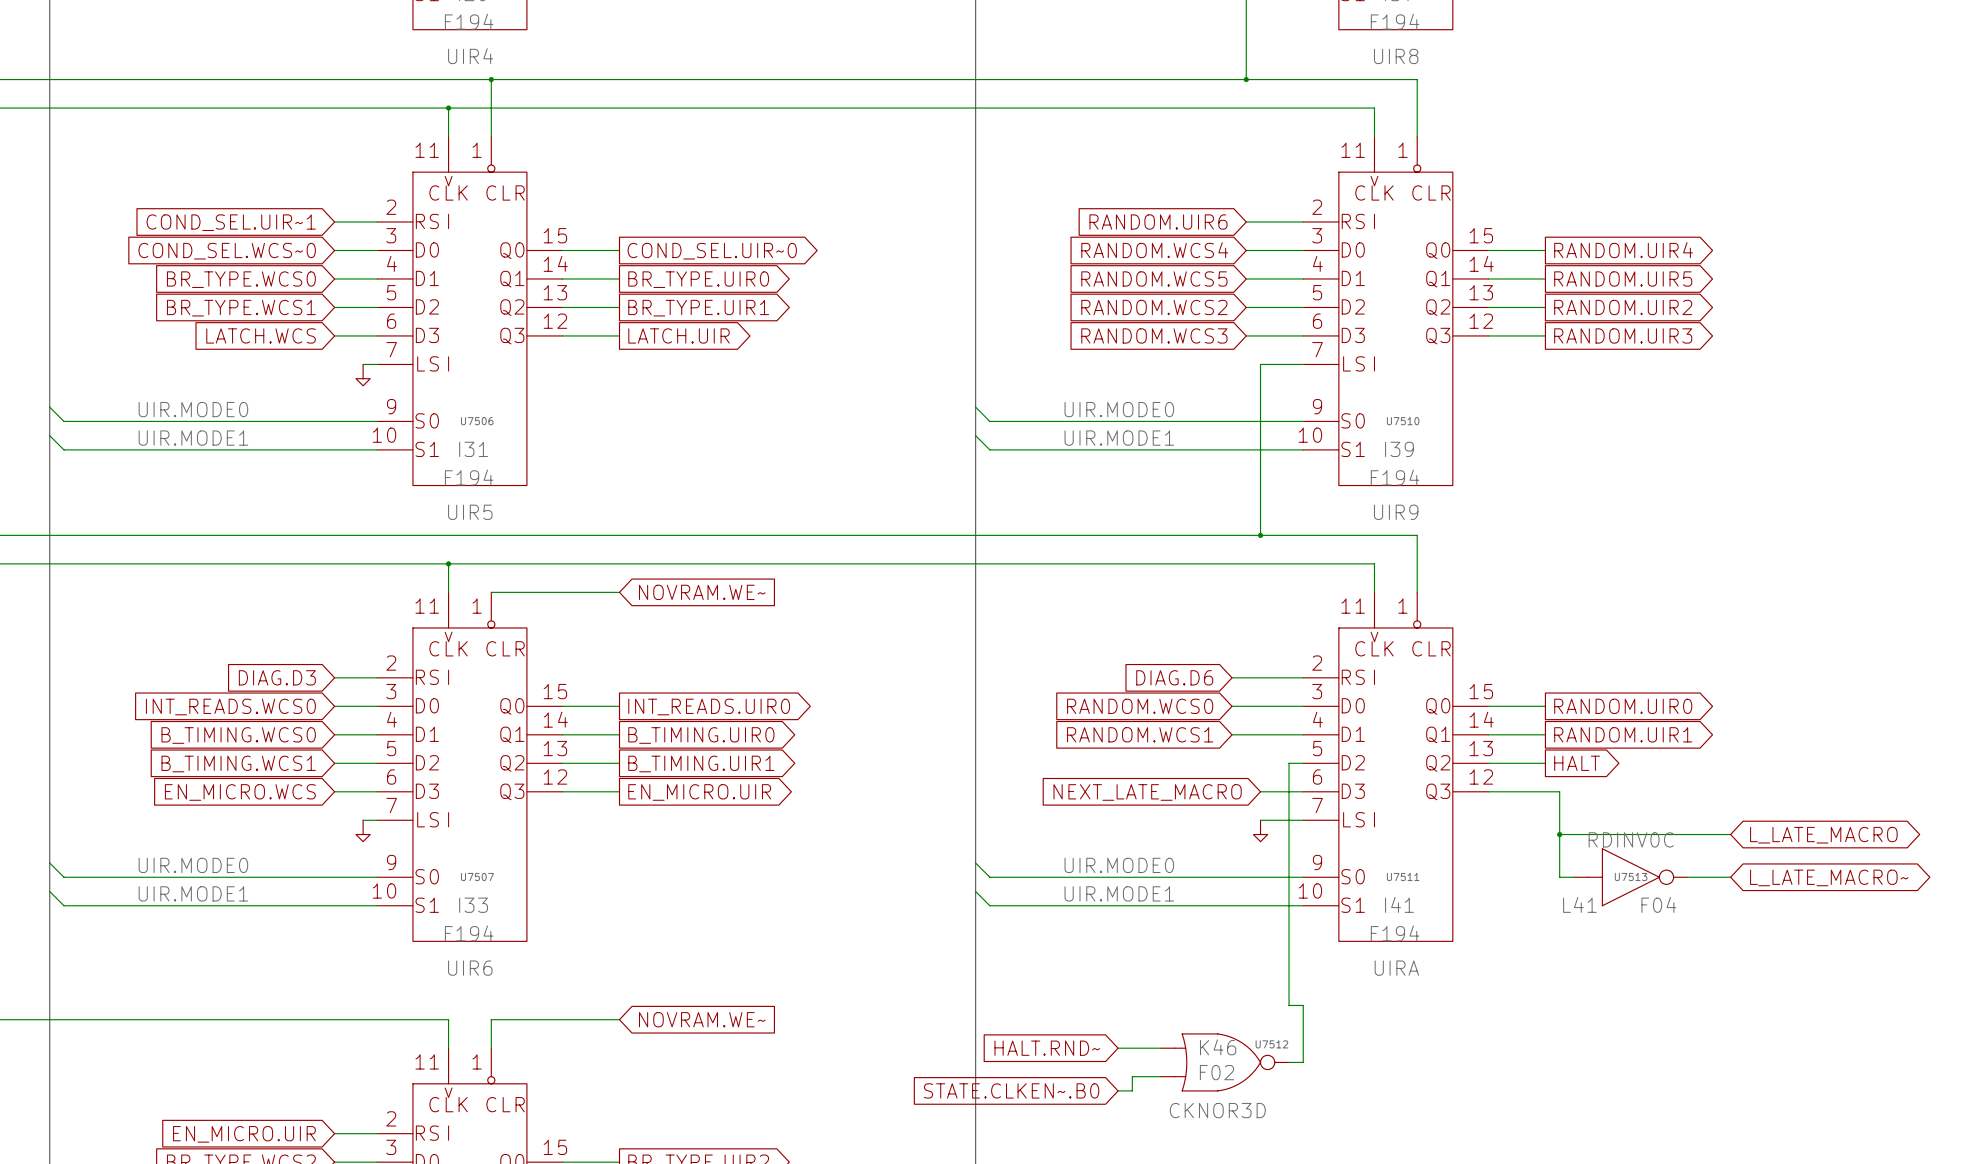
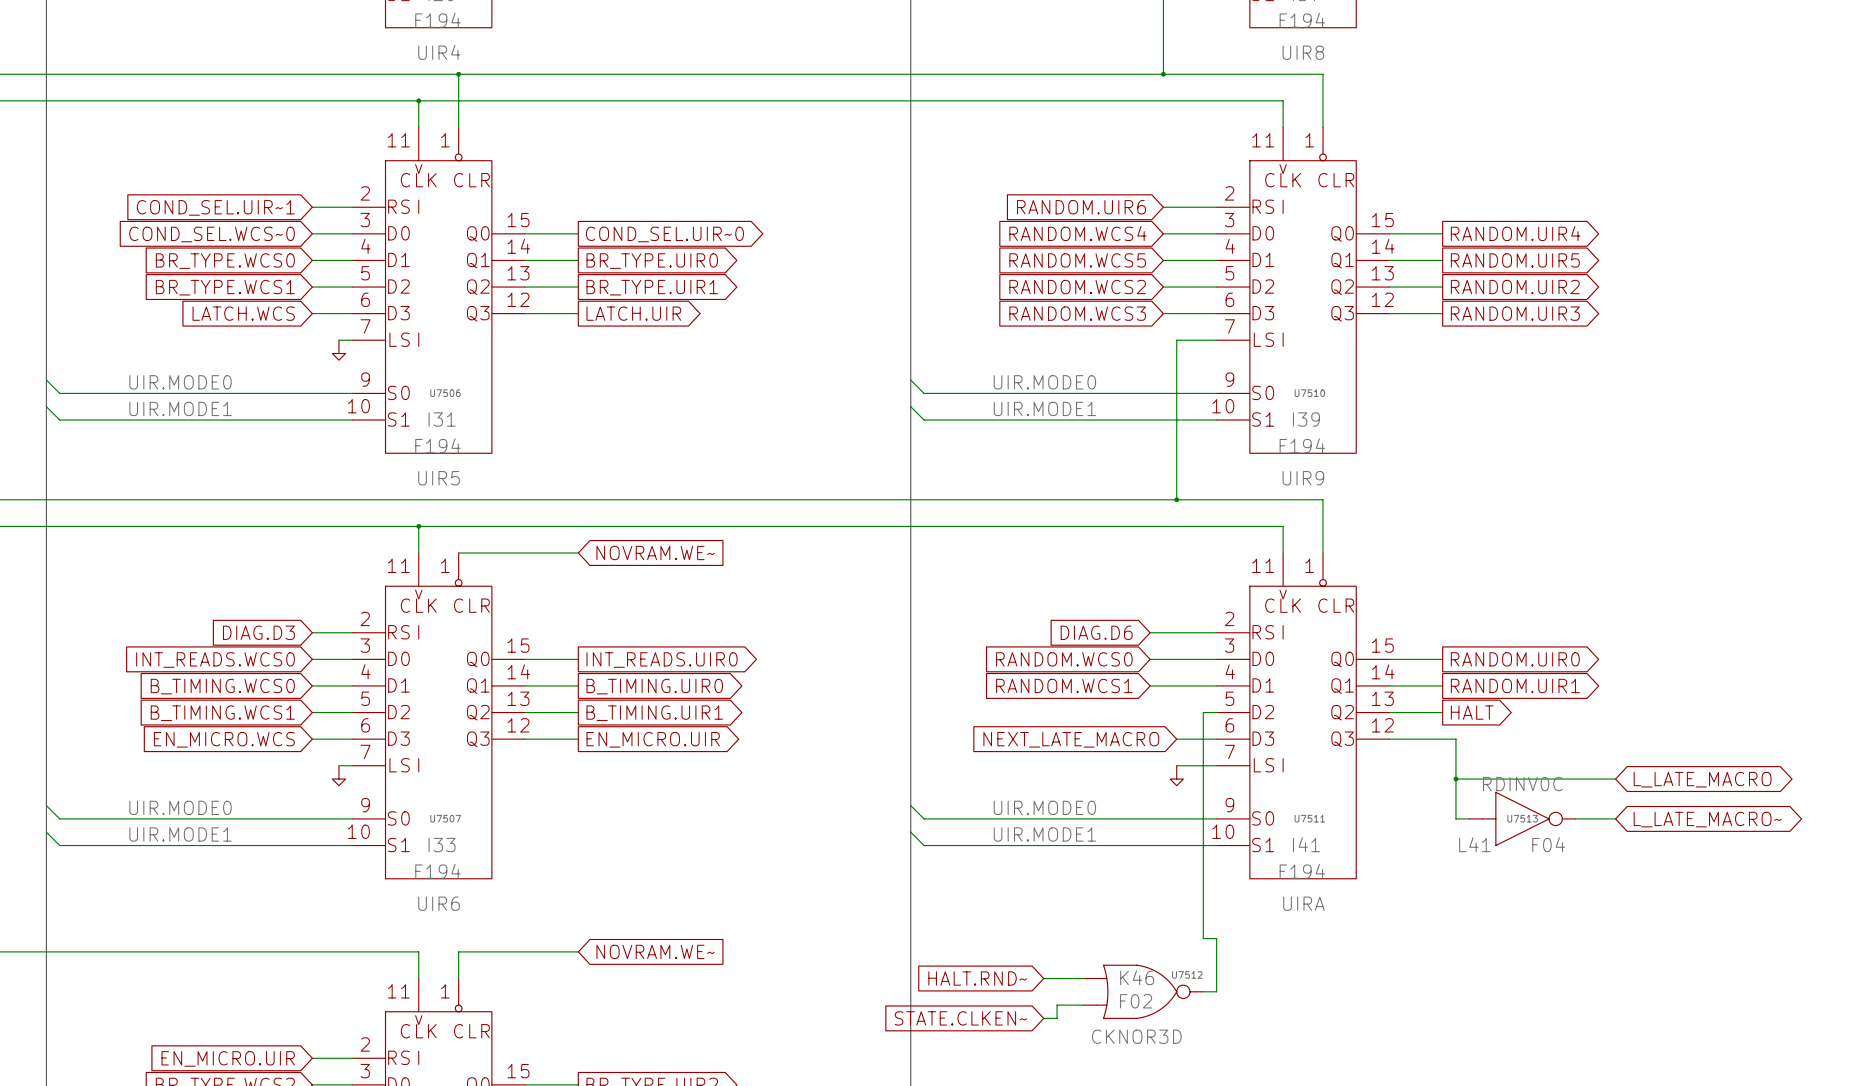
global label: STATE.CLKEN~.B0 (1011, 1090) -> STATE.CLKEN~ (960, 1018)

